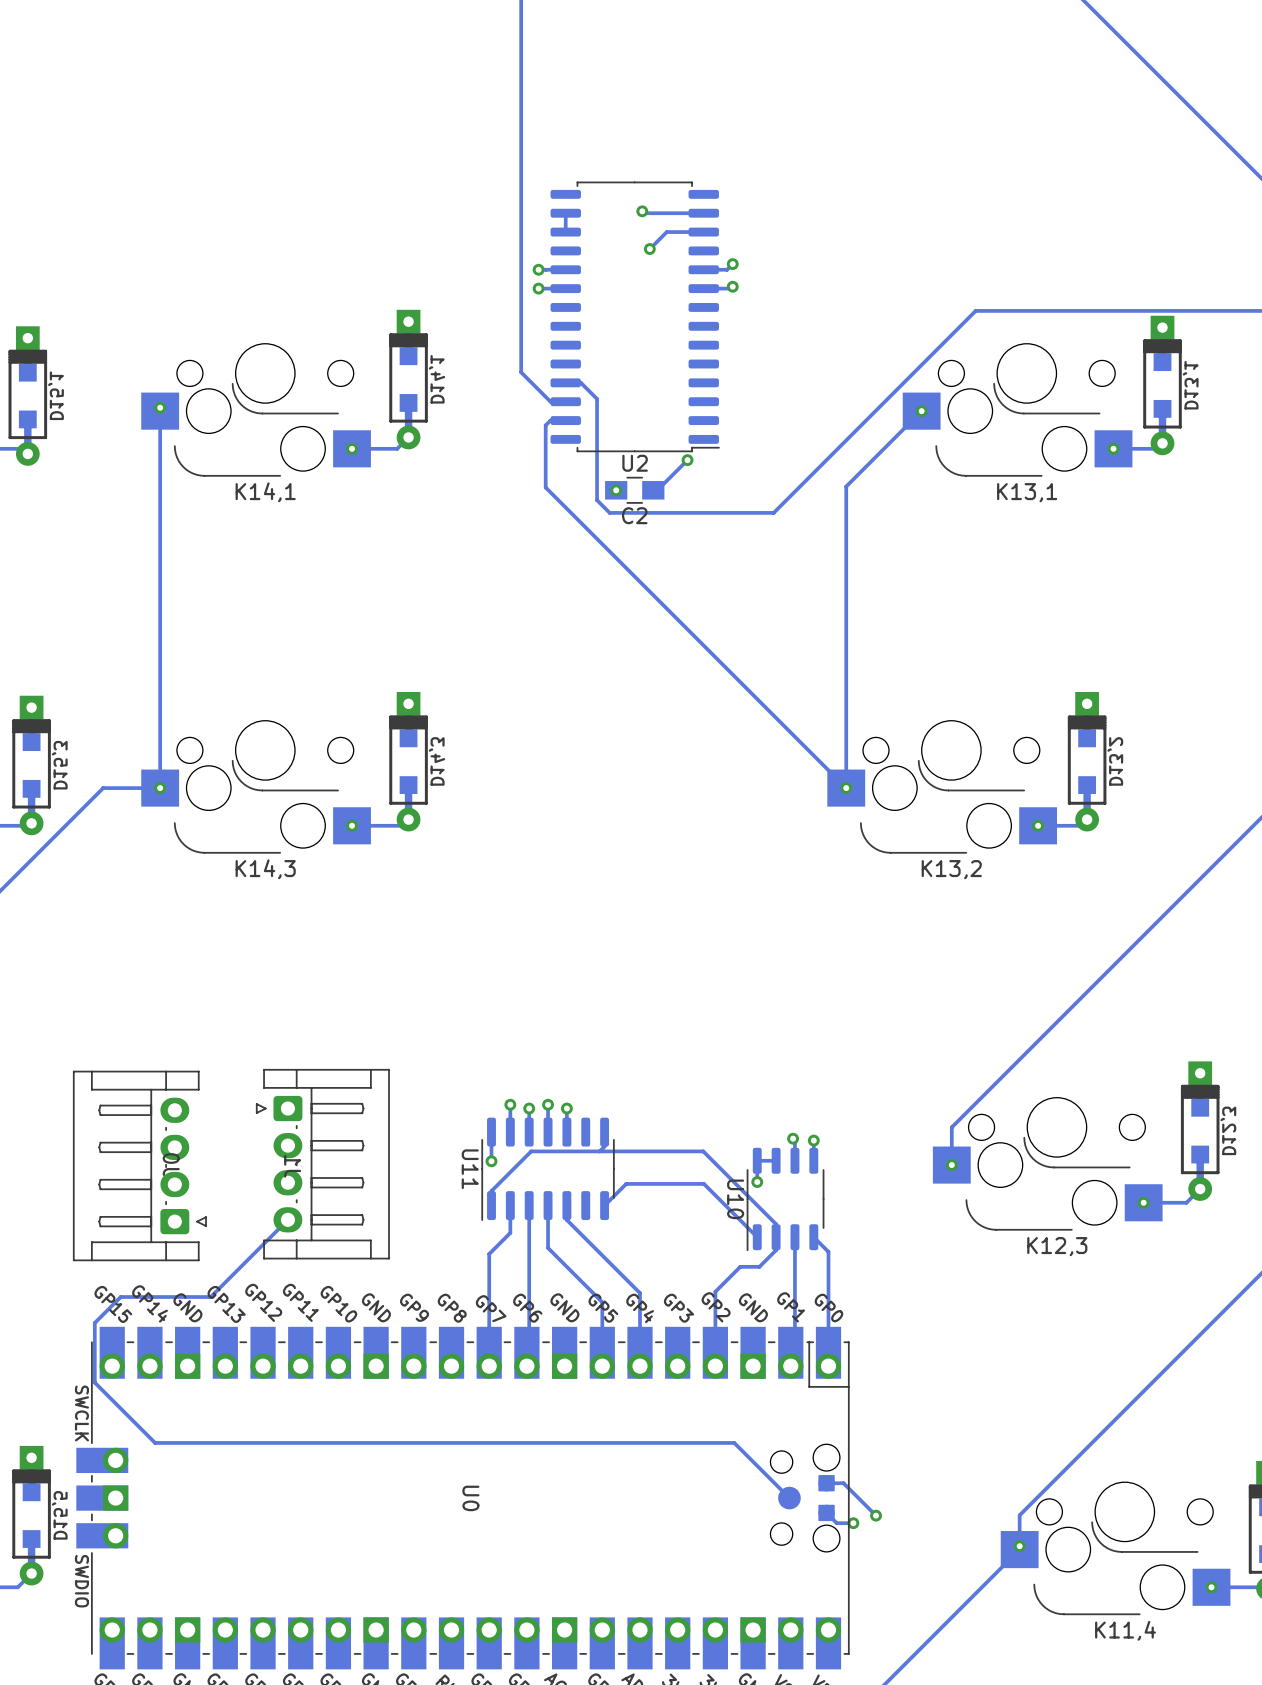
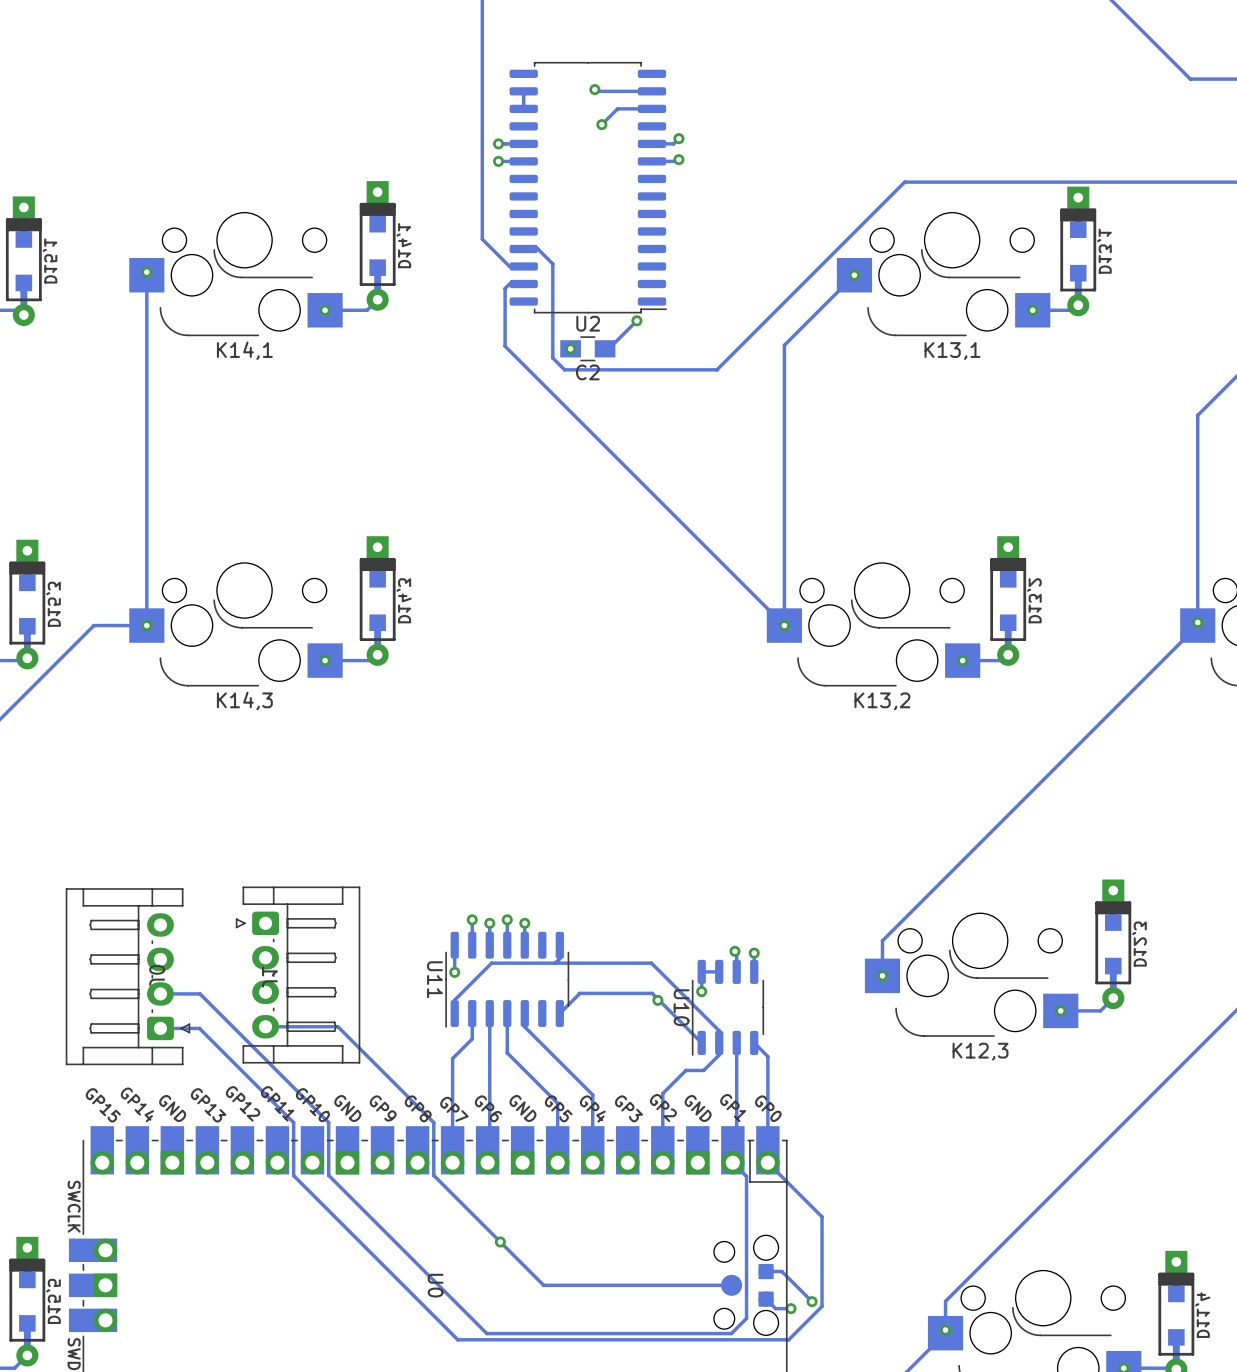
track: none -> (160, 993) (200, 993) (328, 1122) (328, 1175) (486, 1333) (731, 1333) (746, 1318) (746, 1176) (732, 1162)
via: none -> (657, 1000)
track: (287, 1219) (210, 1297) (120, 1297) (94, 1322) (94, 1382) (155, 1442) (734, 1442) (789, 1498) -> (265, 1026) (337, 1026) (433, 1122) (433, 1175) (543, 1285) (731, 1285)
track: none -> (160, 1028) (199, 1028) (293, 1122) (293, 1175) (457, 1339) (788, 1339) (822, 1306) (822, 1216) (767, 1162)
via: none -> (500, 1241)

